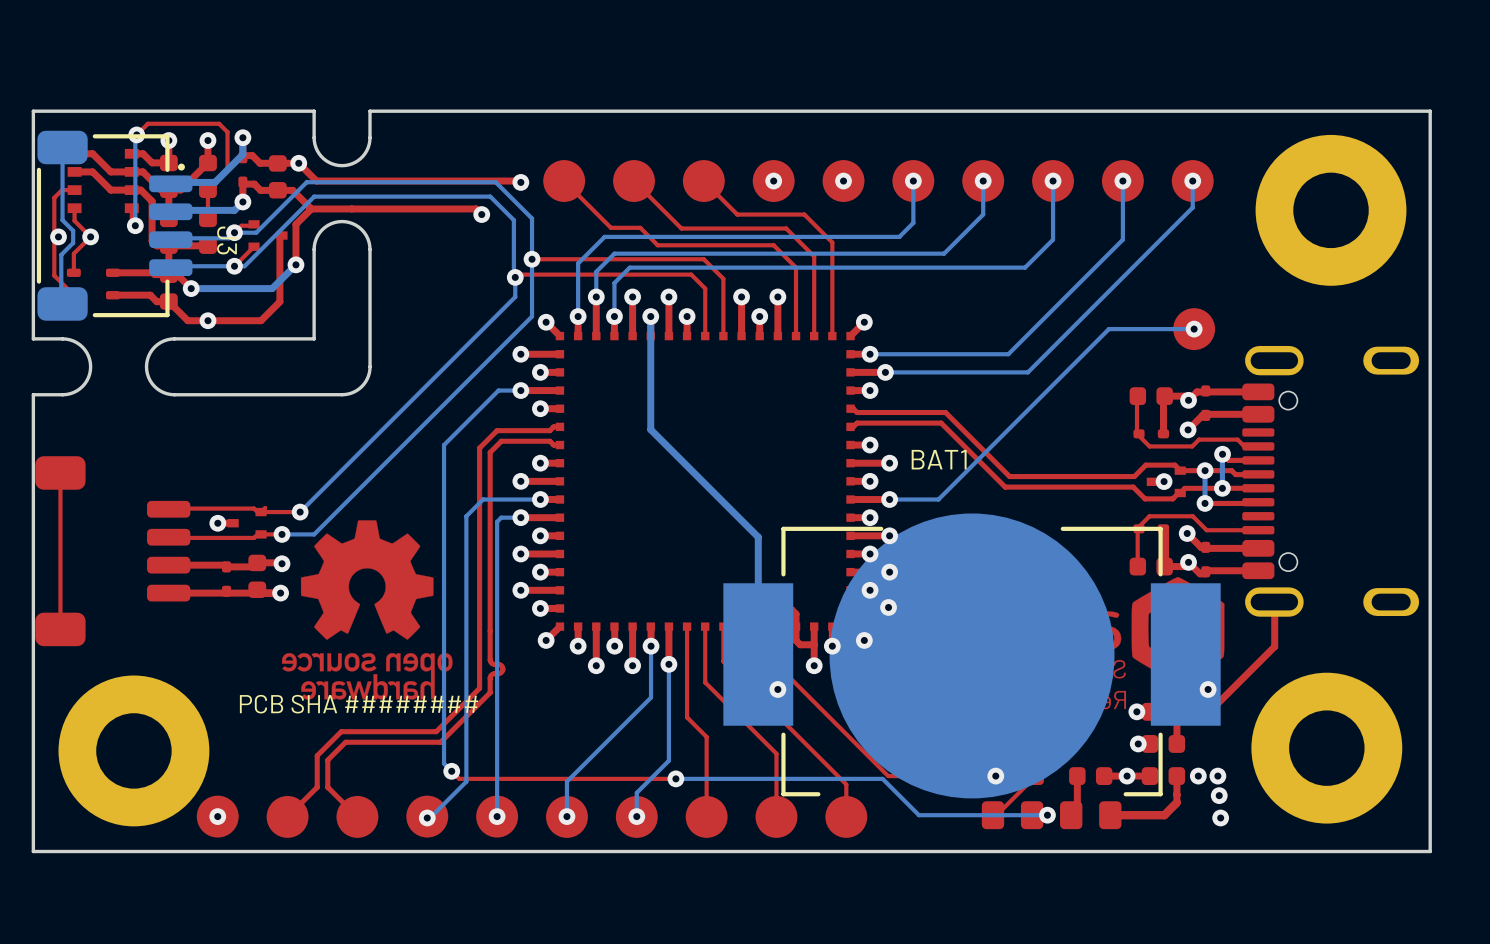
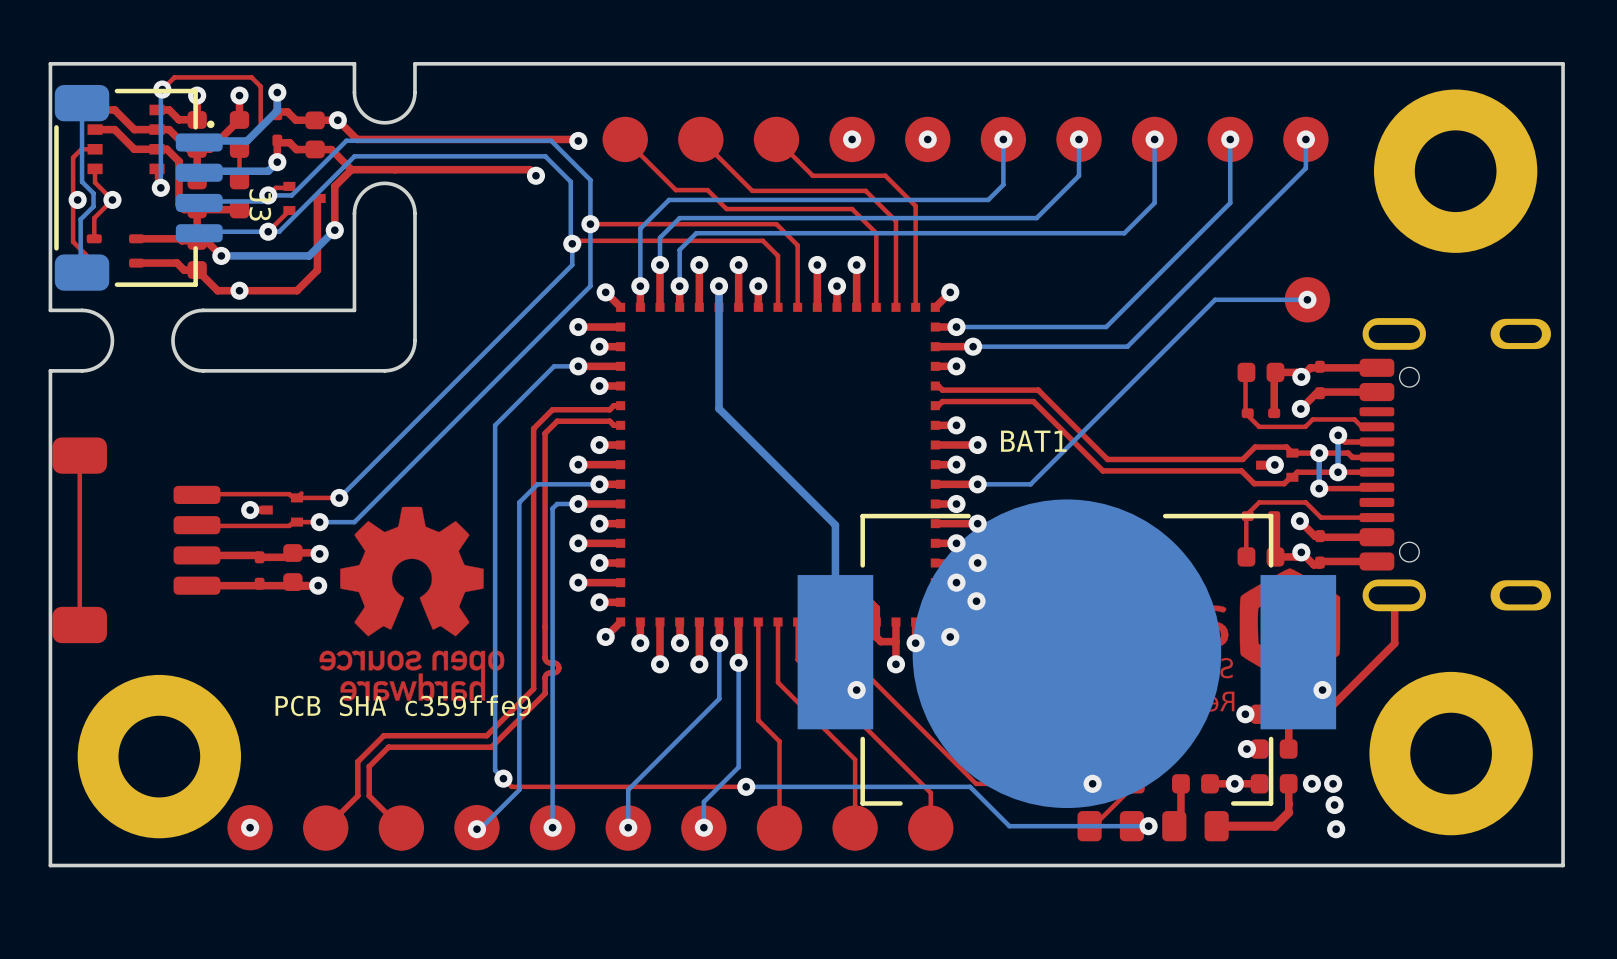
text: PCB SHA ######## (359, 704) -> PCB SHA c359ffe9 (403, 705)

